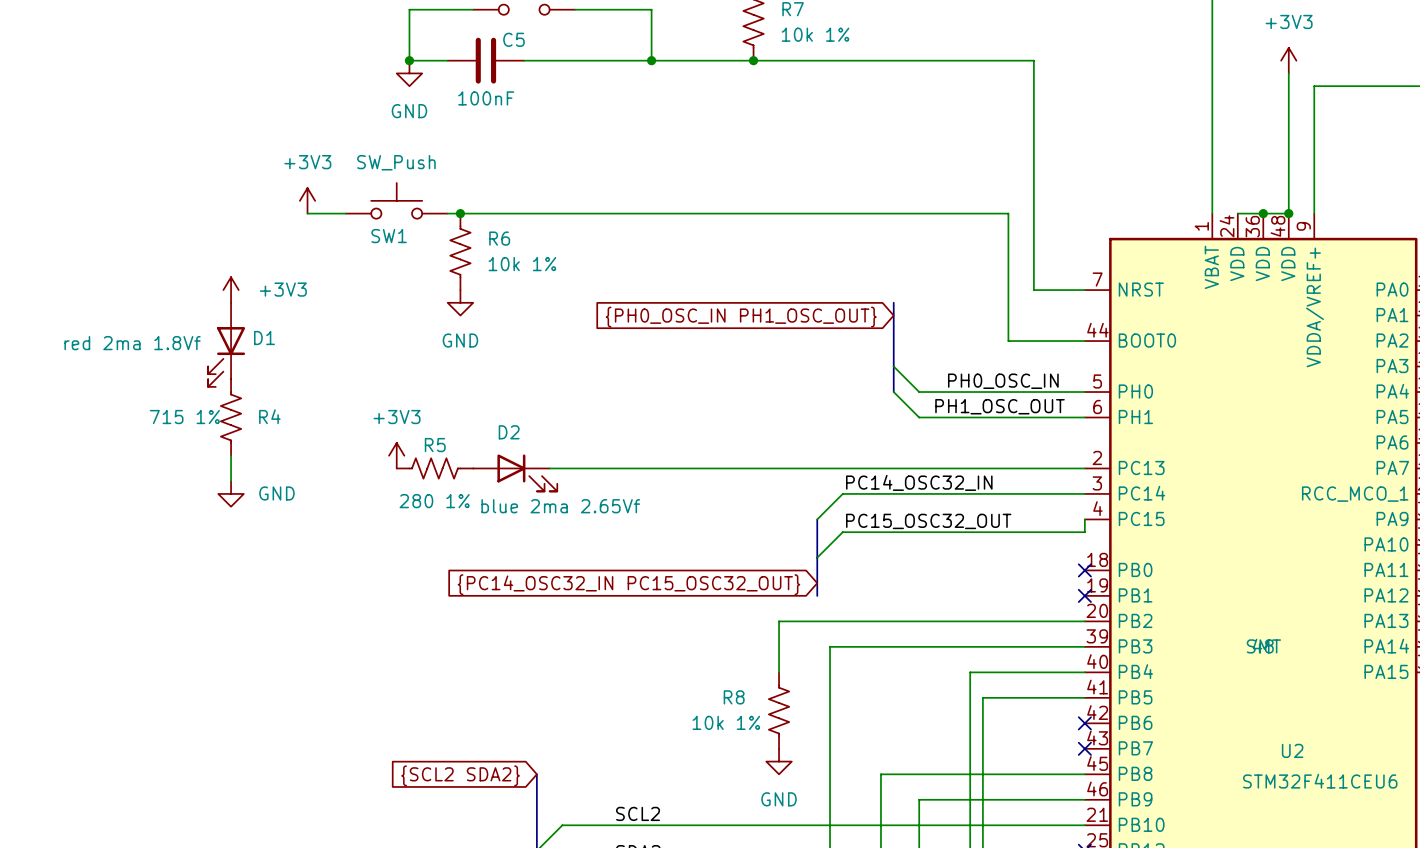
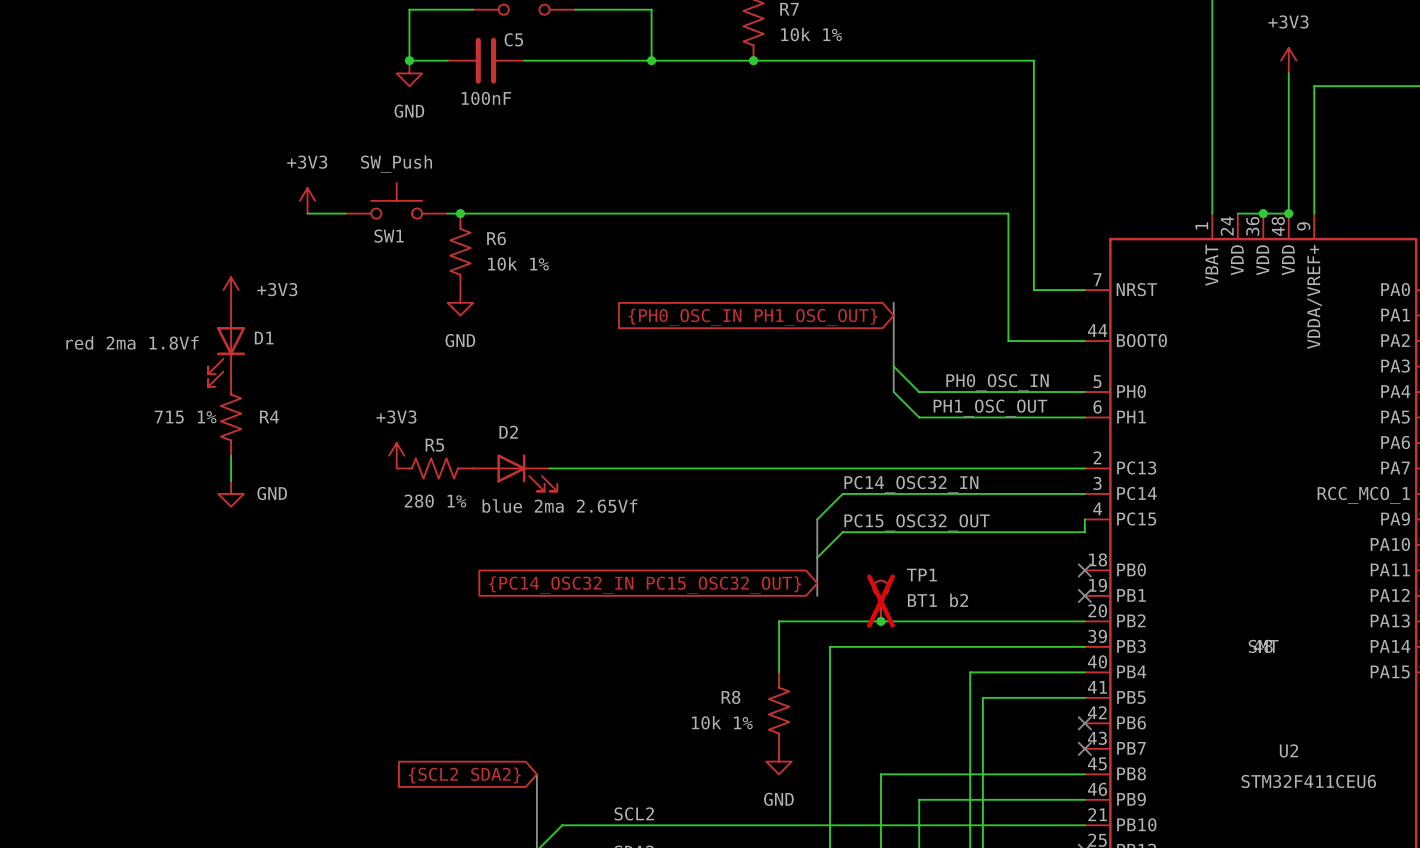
TP1: none -> BT1 b2 (880, 601)
junction: none -> (880, 621)

